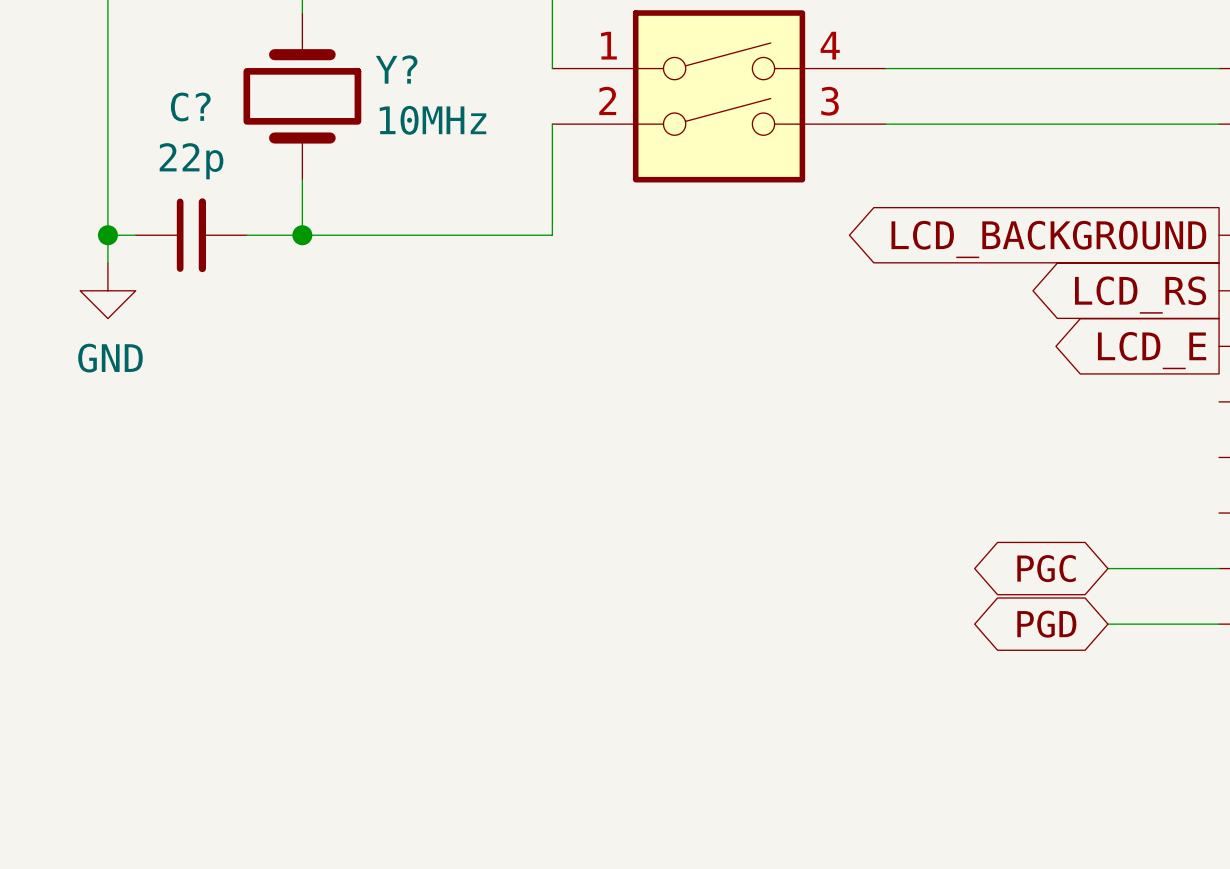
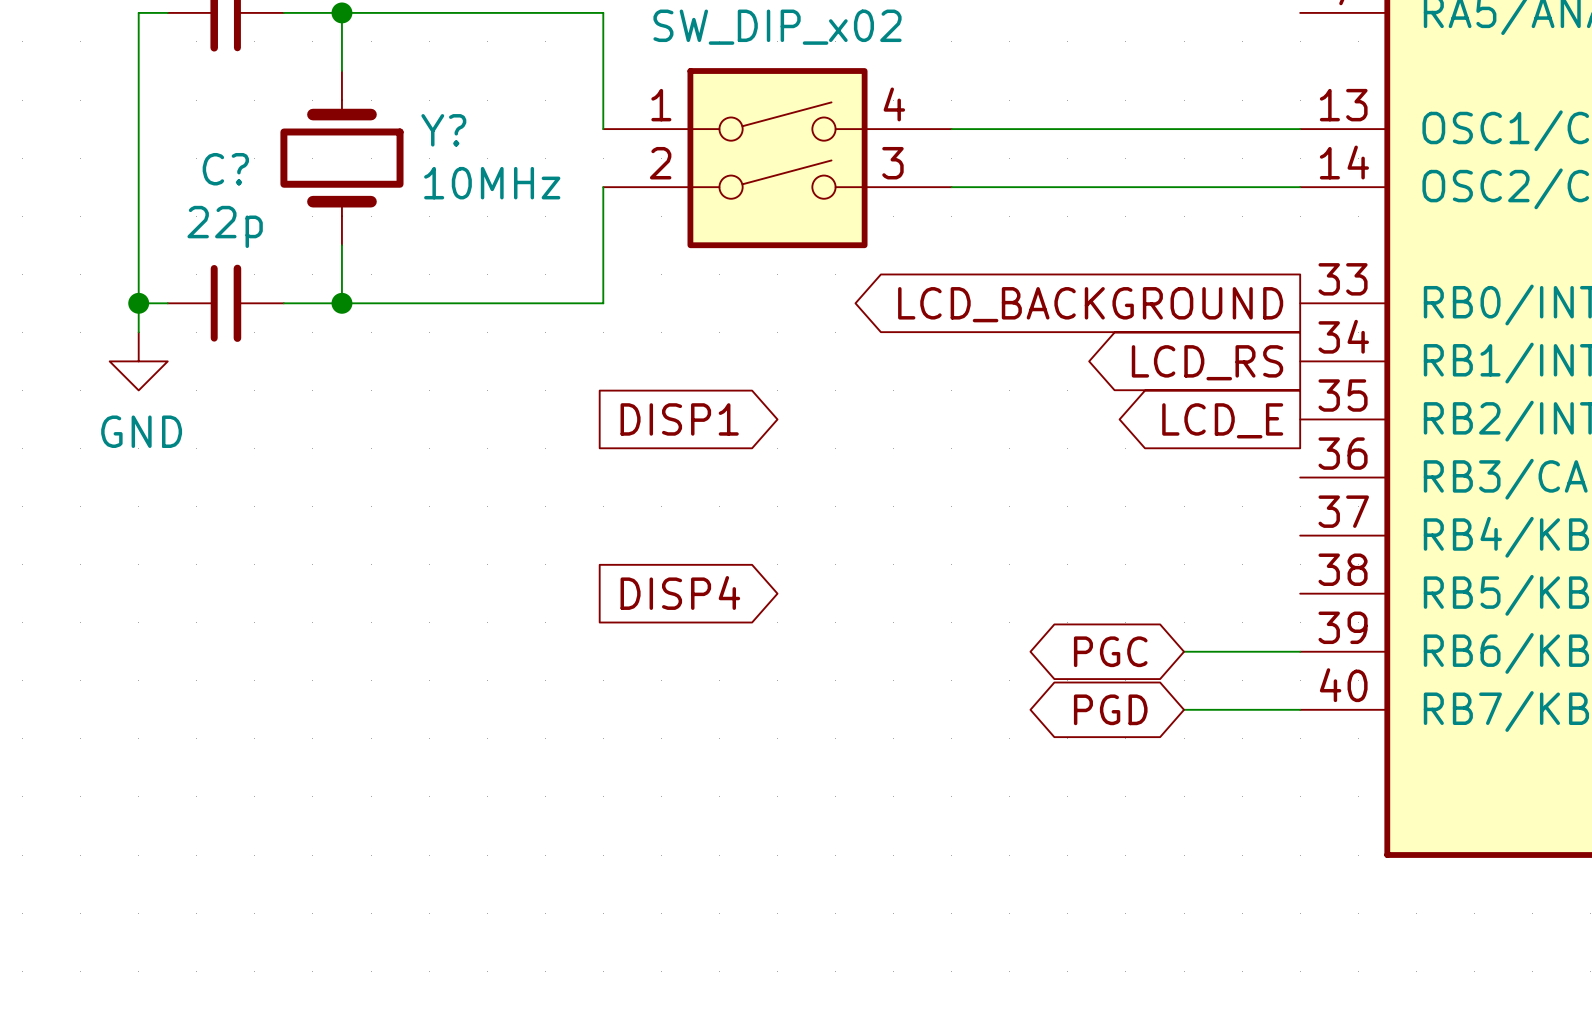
global label: none -> DISP1 (679, 419)
global label: none -> DISP4 (680, 592)

